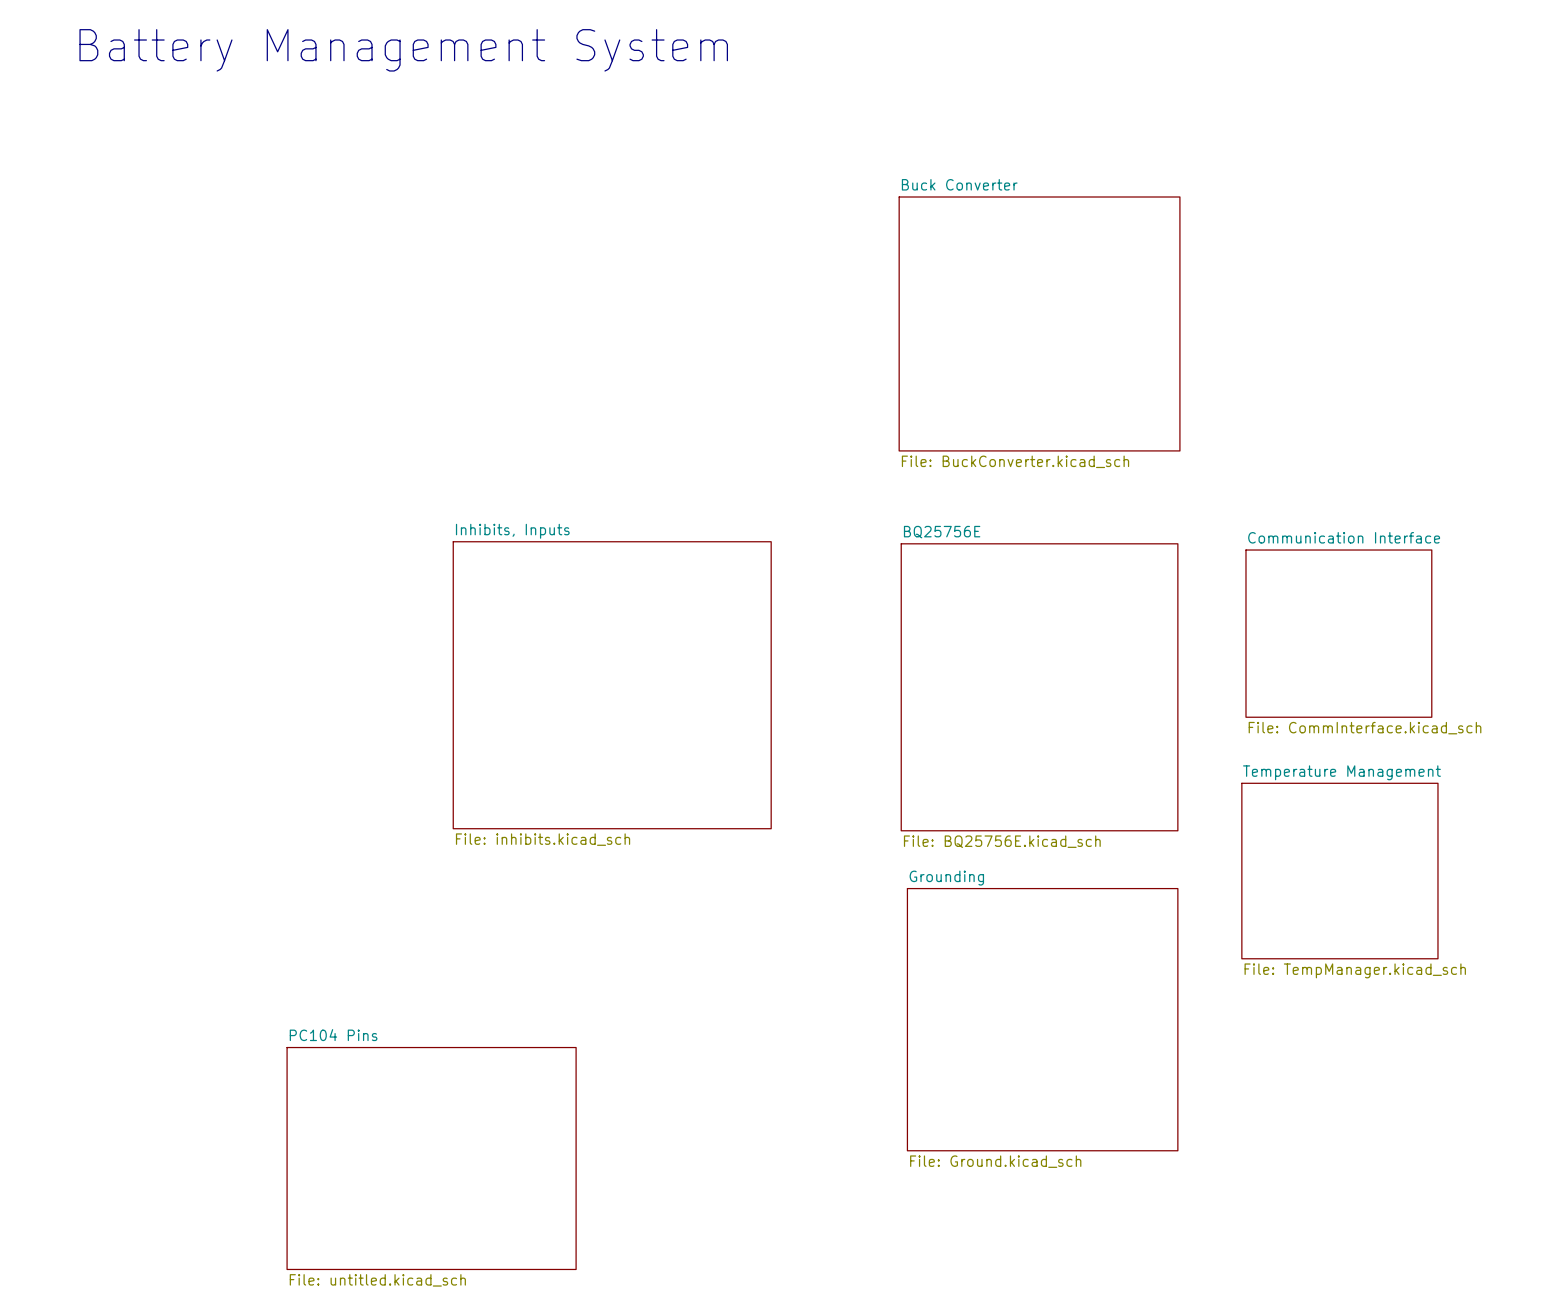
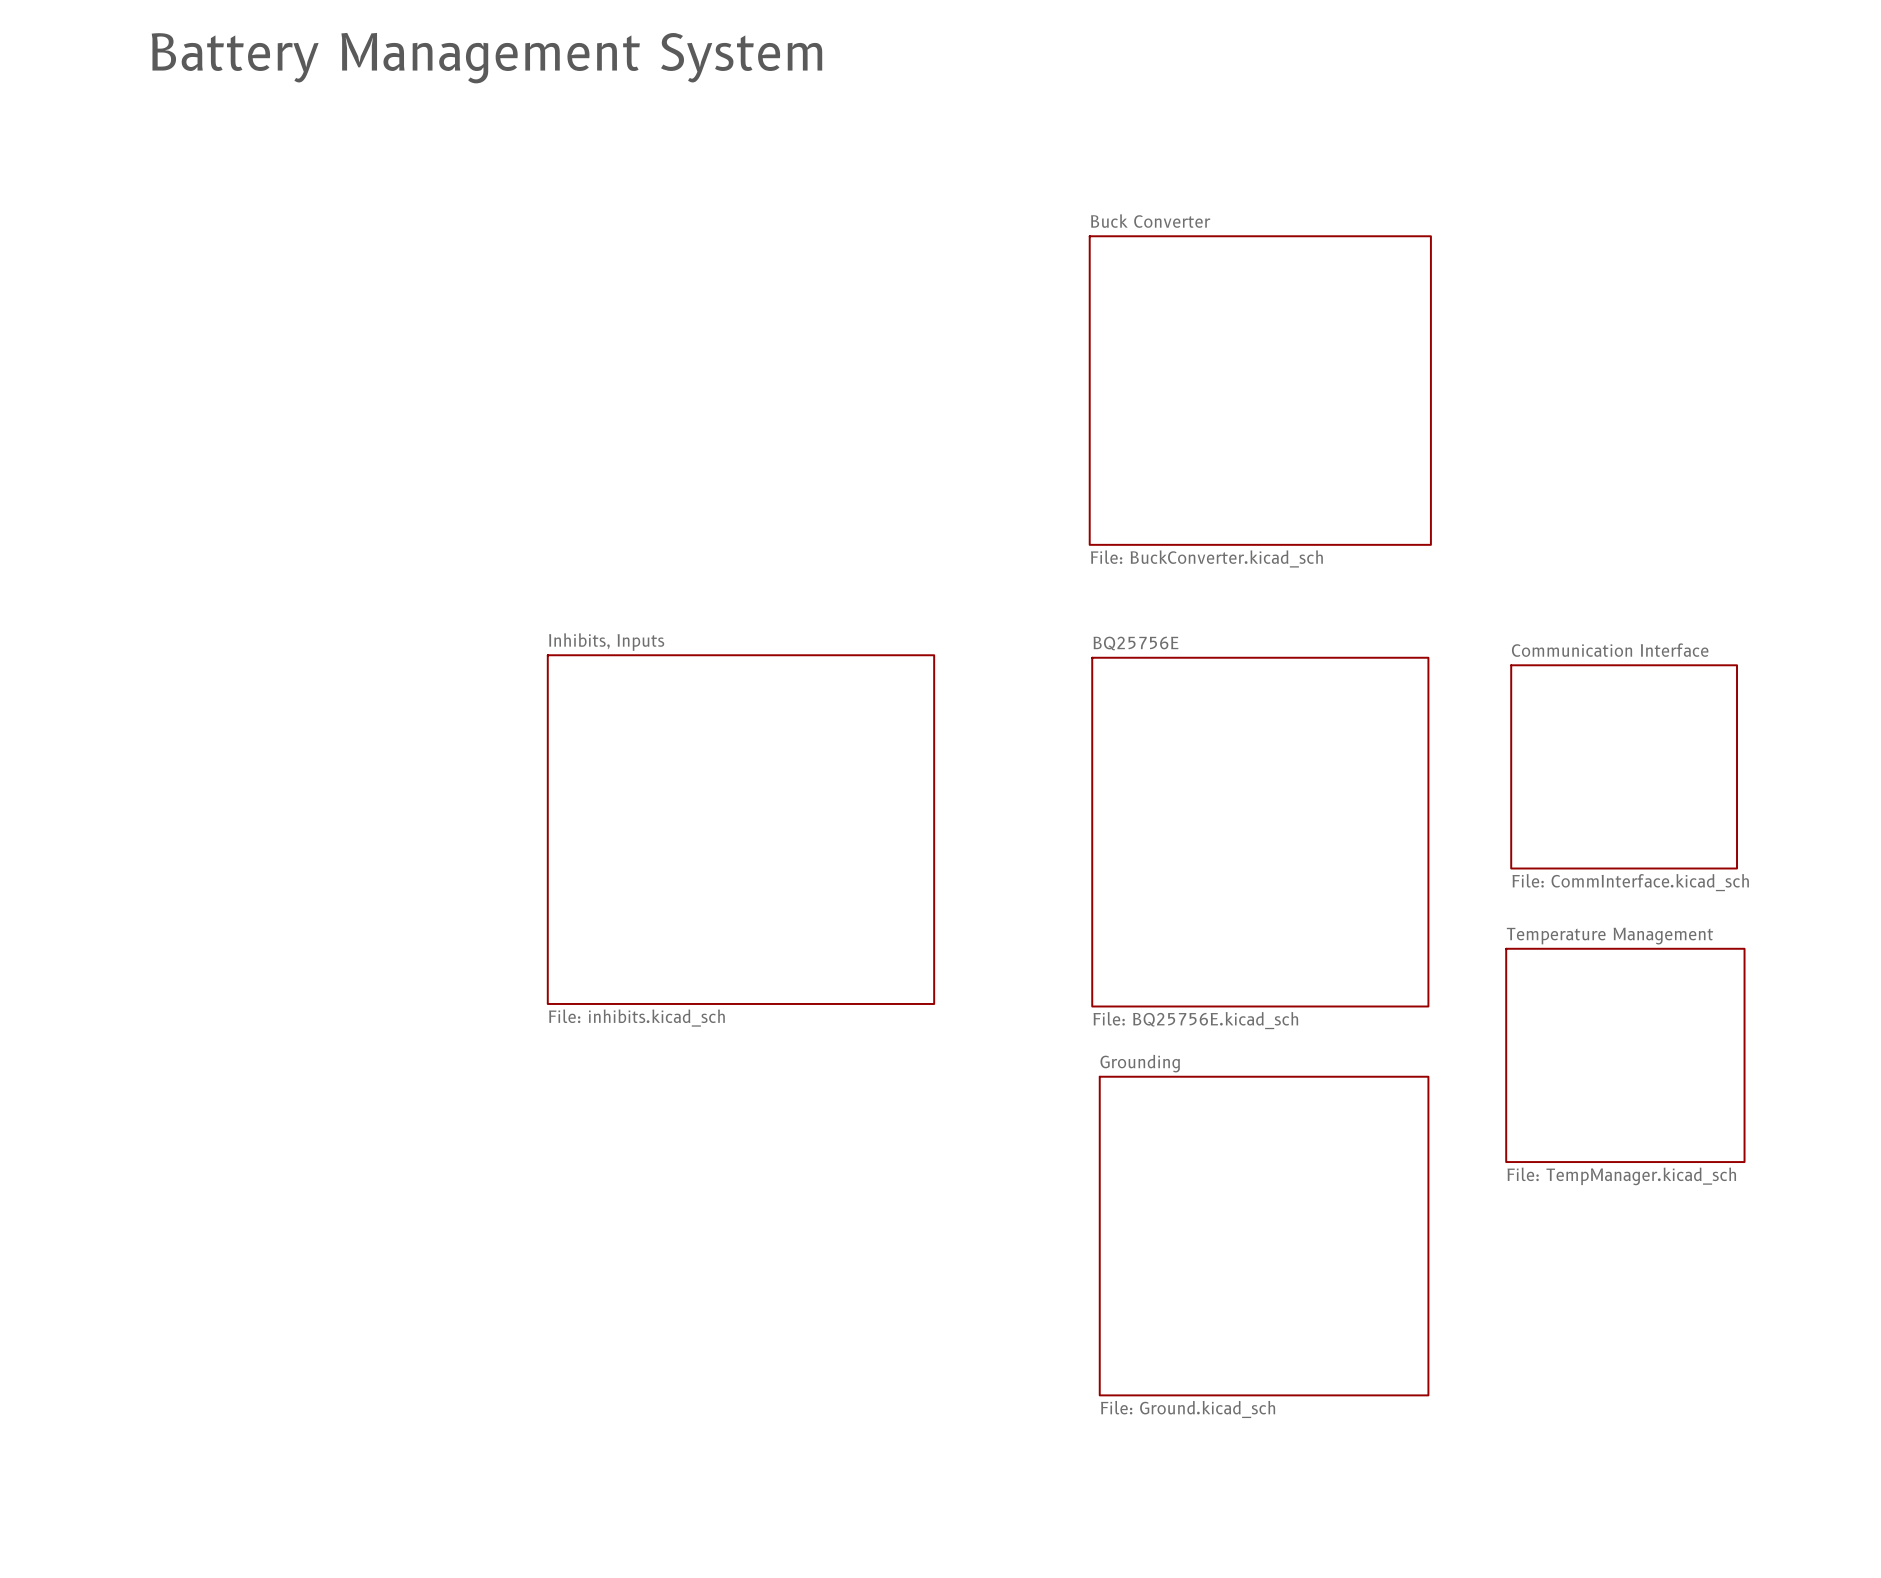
sheet PC104 Pins: File: untitled.kicad_sch (431, 1158) -> none

